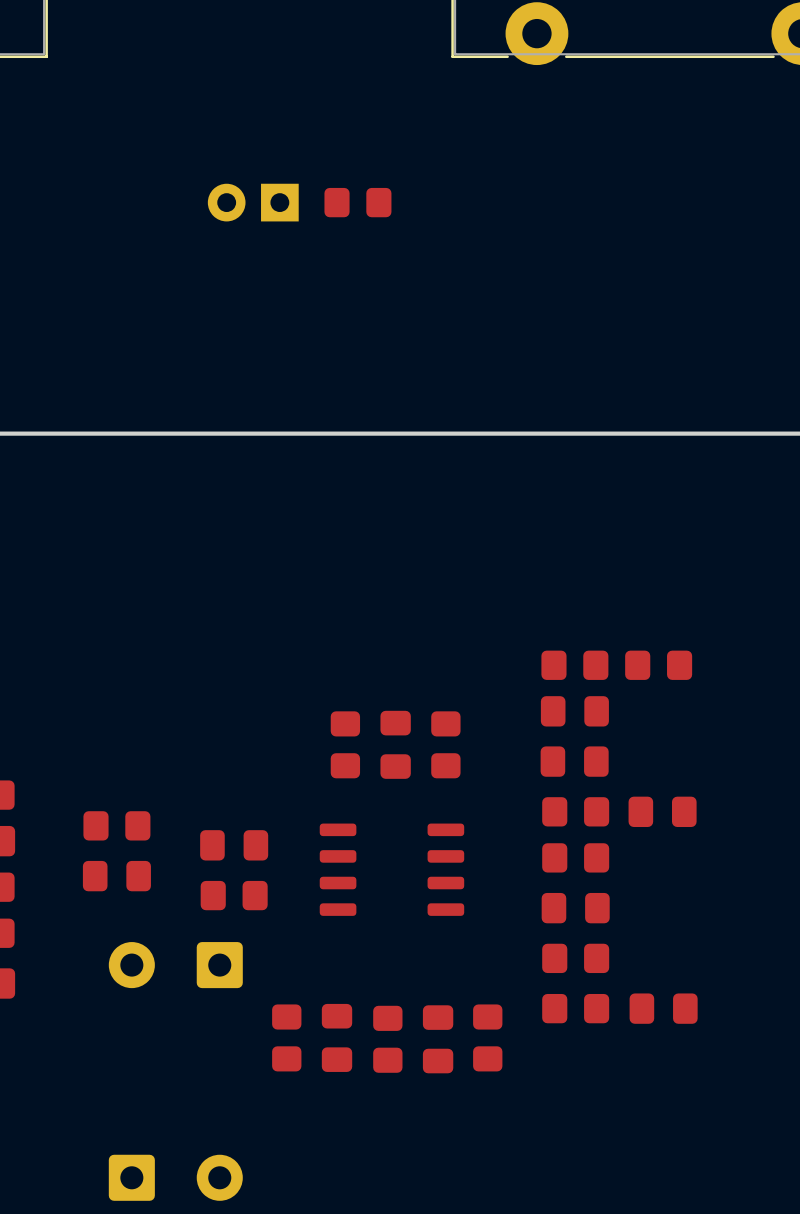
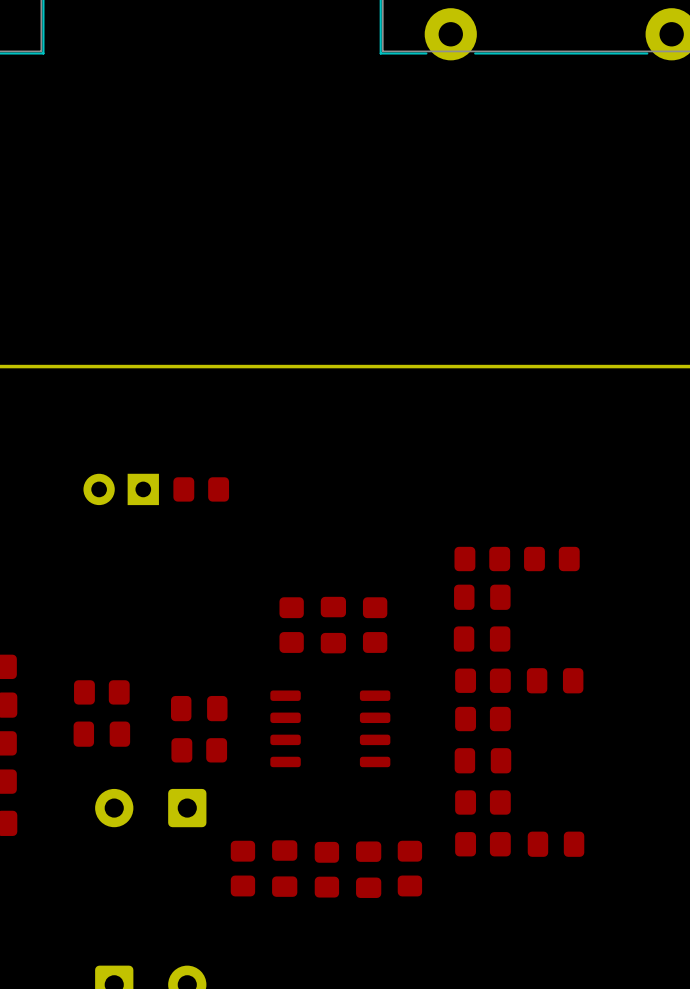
part position: (253, 202) -> (121, 489)
part: (357, 202) -> none
part: none -> (201, 489)

